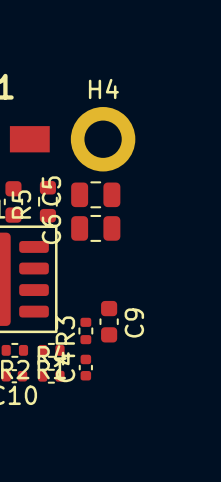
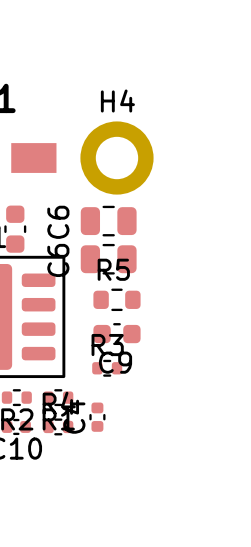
C5 name: C5 (51, 190) -> C6 (58, 222)
R5 rotation: 0° (47, 201) -> 90° clockwise (116, 299)
R5 position: (47, 201) -> (116, 299)
C9 rotation: 0° (109, 321) -> 90° clockwise (116, 334)
C9 position: (109, 321) -> (116, 334)
R3 rotation: 0° (85, 330) -> 90° clockwise (107, 368)

